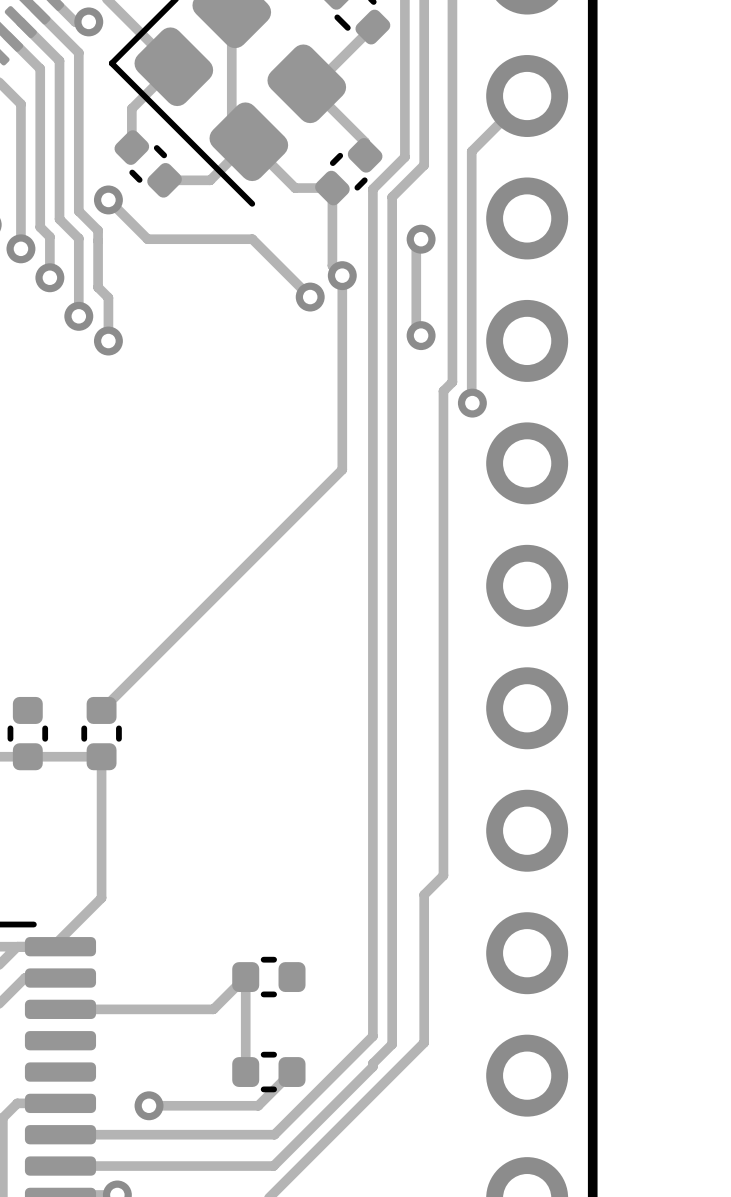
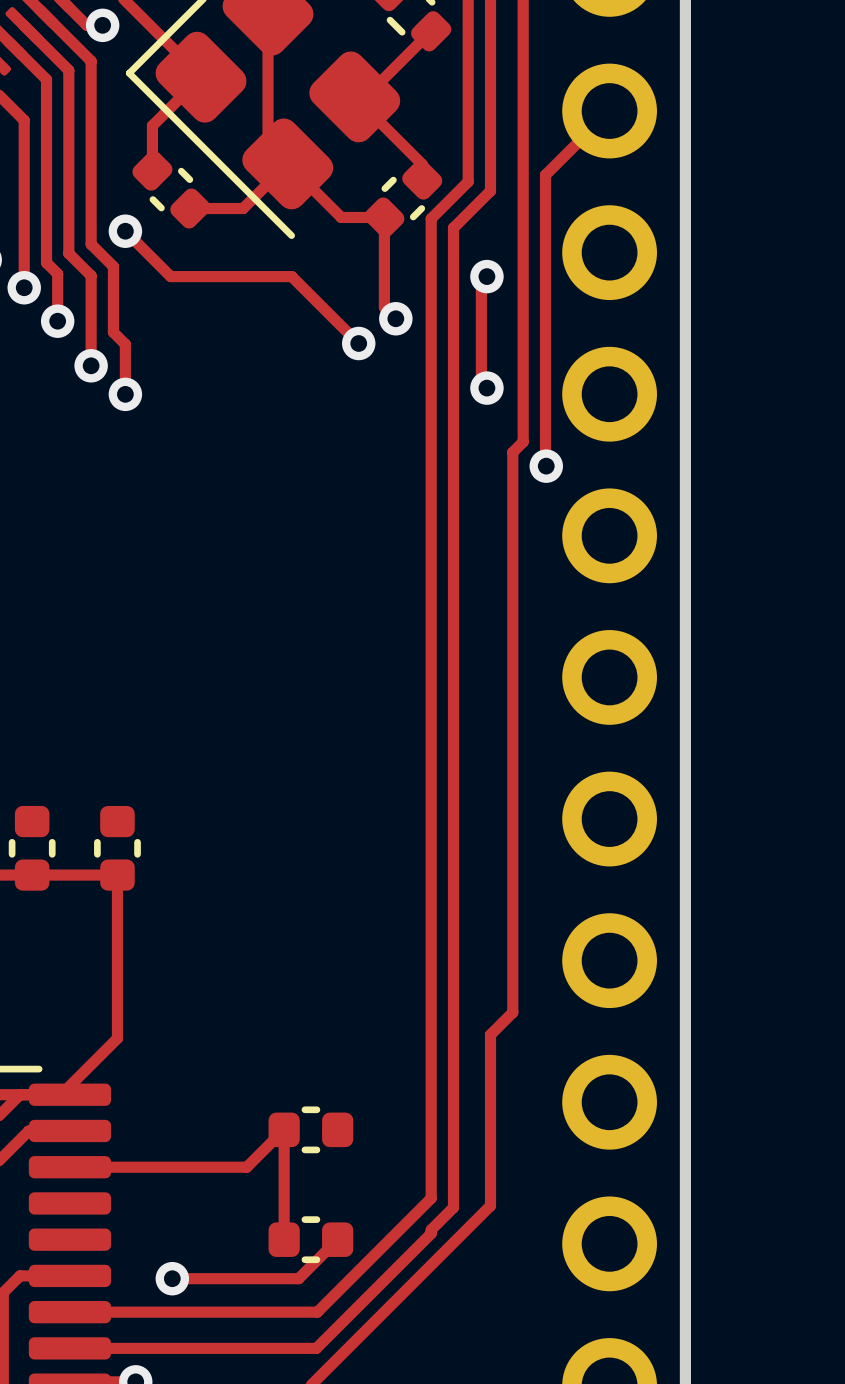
track: (342, 275) (342, 469) (101, 710) -> none

